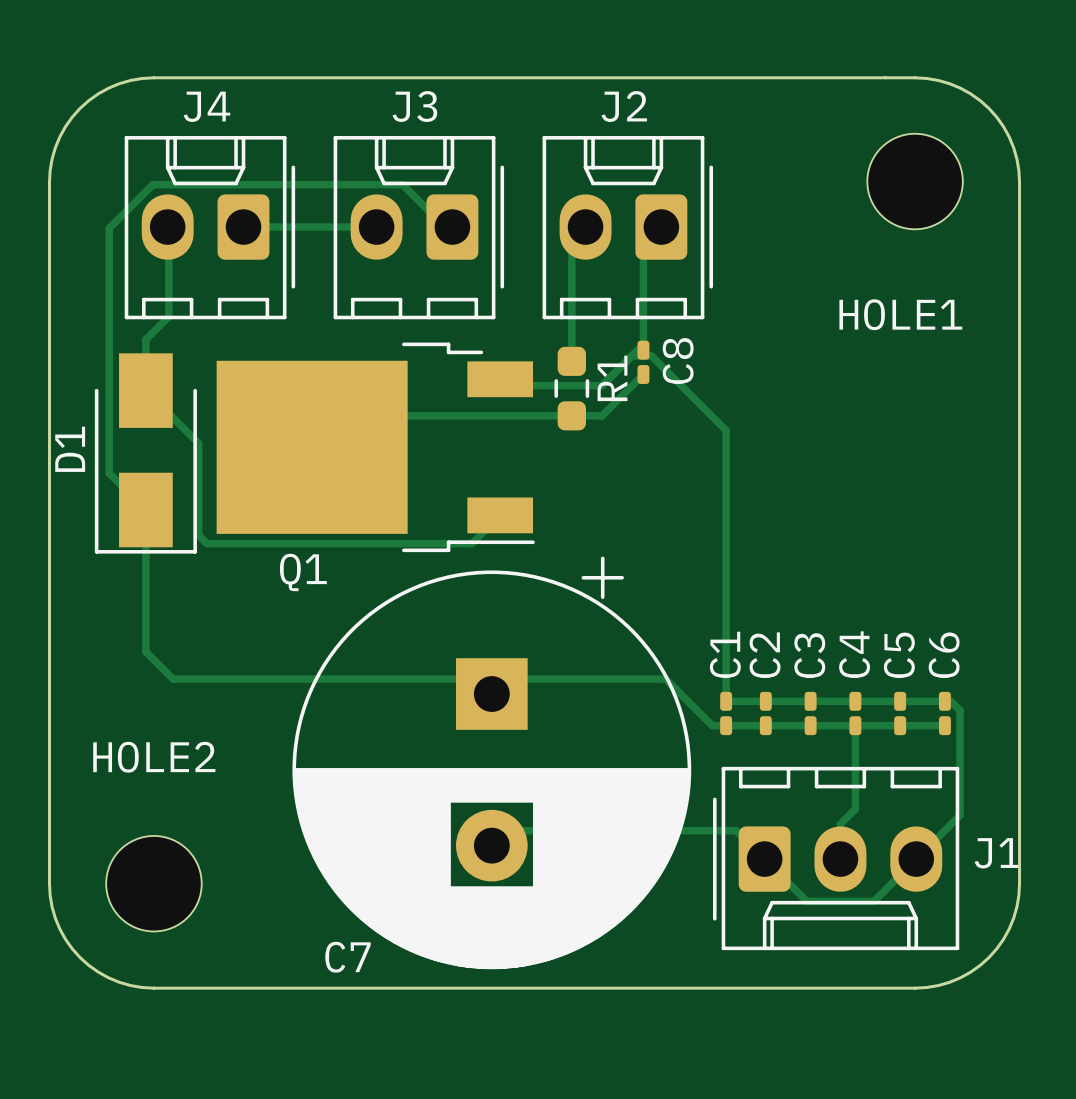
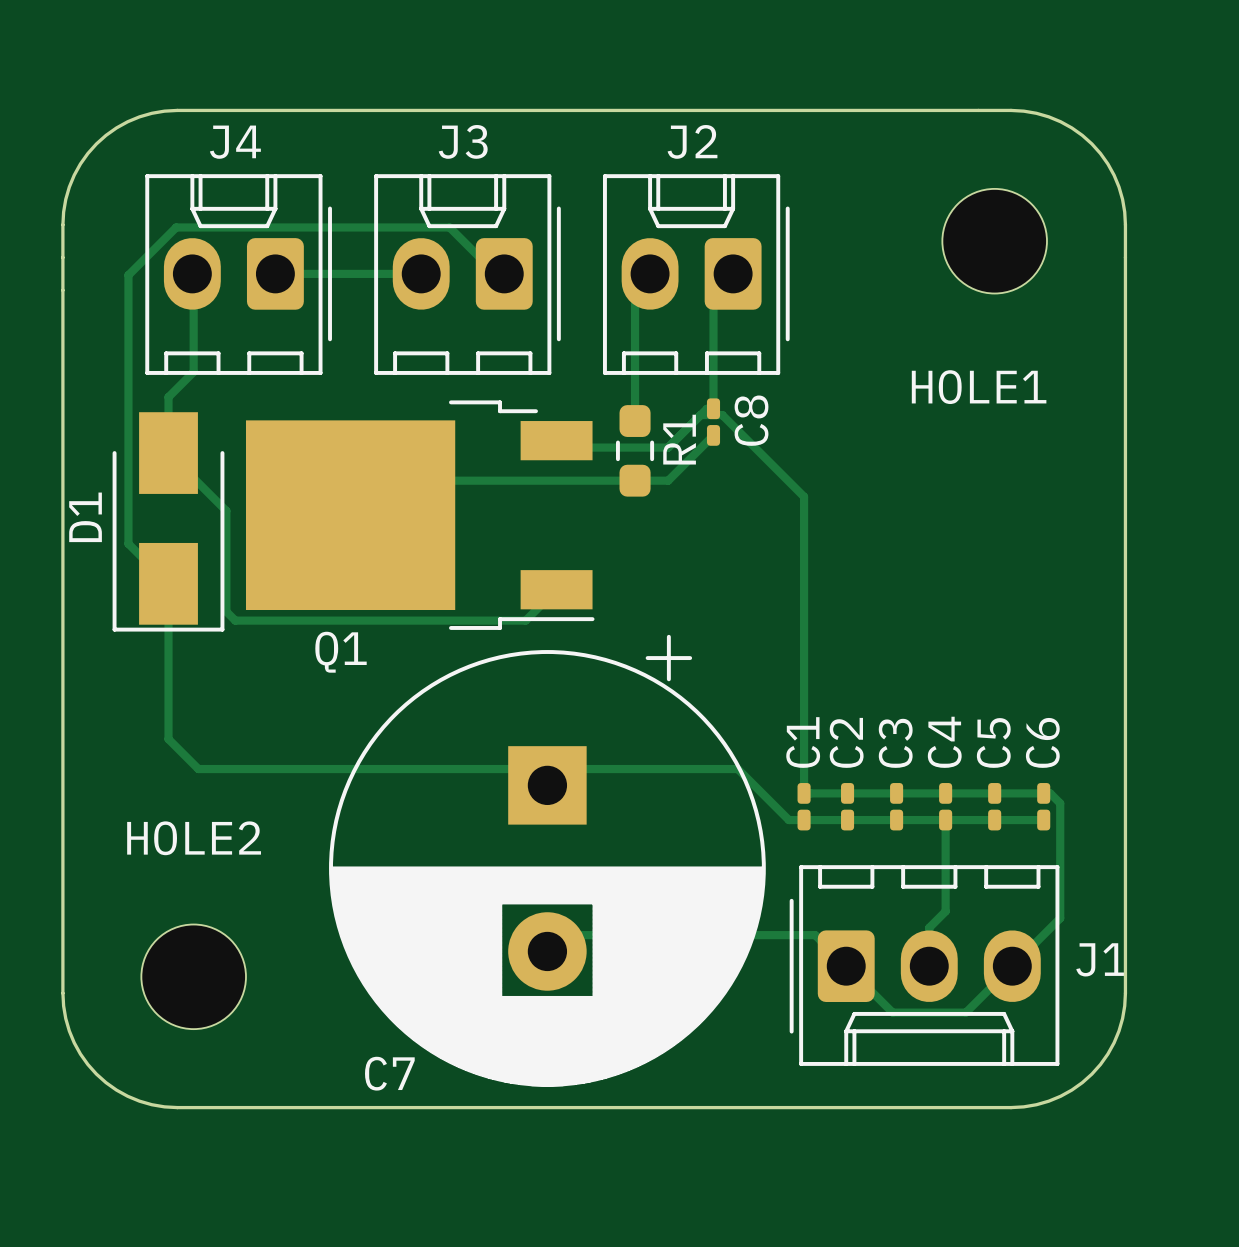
HOLE1 position: (915, 181) -> (994, 241)
HOLE2 position: (153, 883) -> (193, 976)

